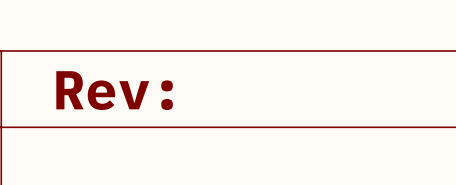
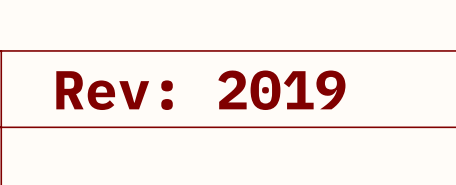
title block: Rev: (114, 90) -> Rev: 2019 (200, 90)

